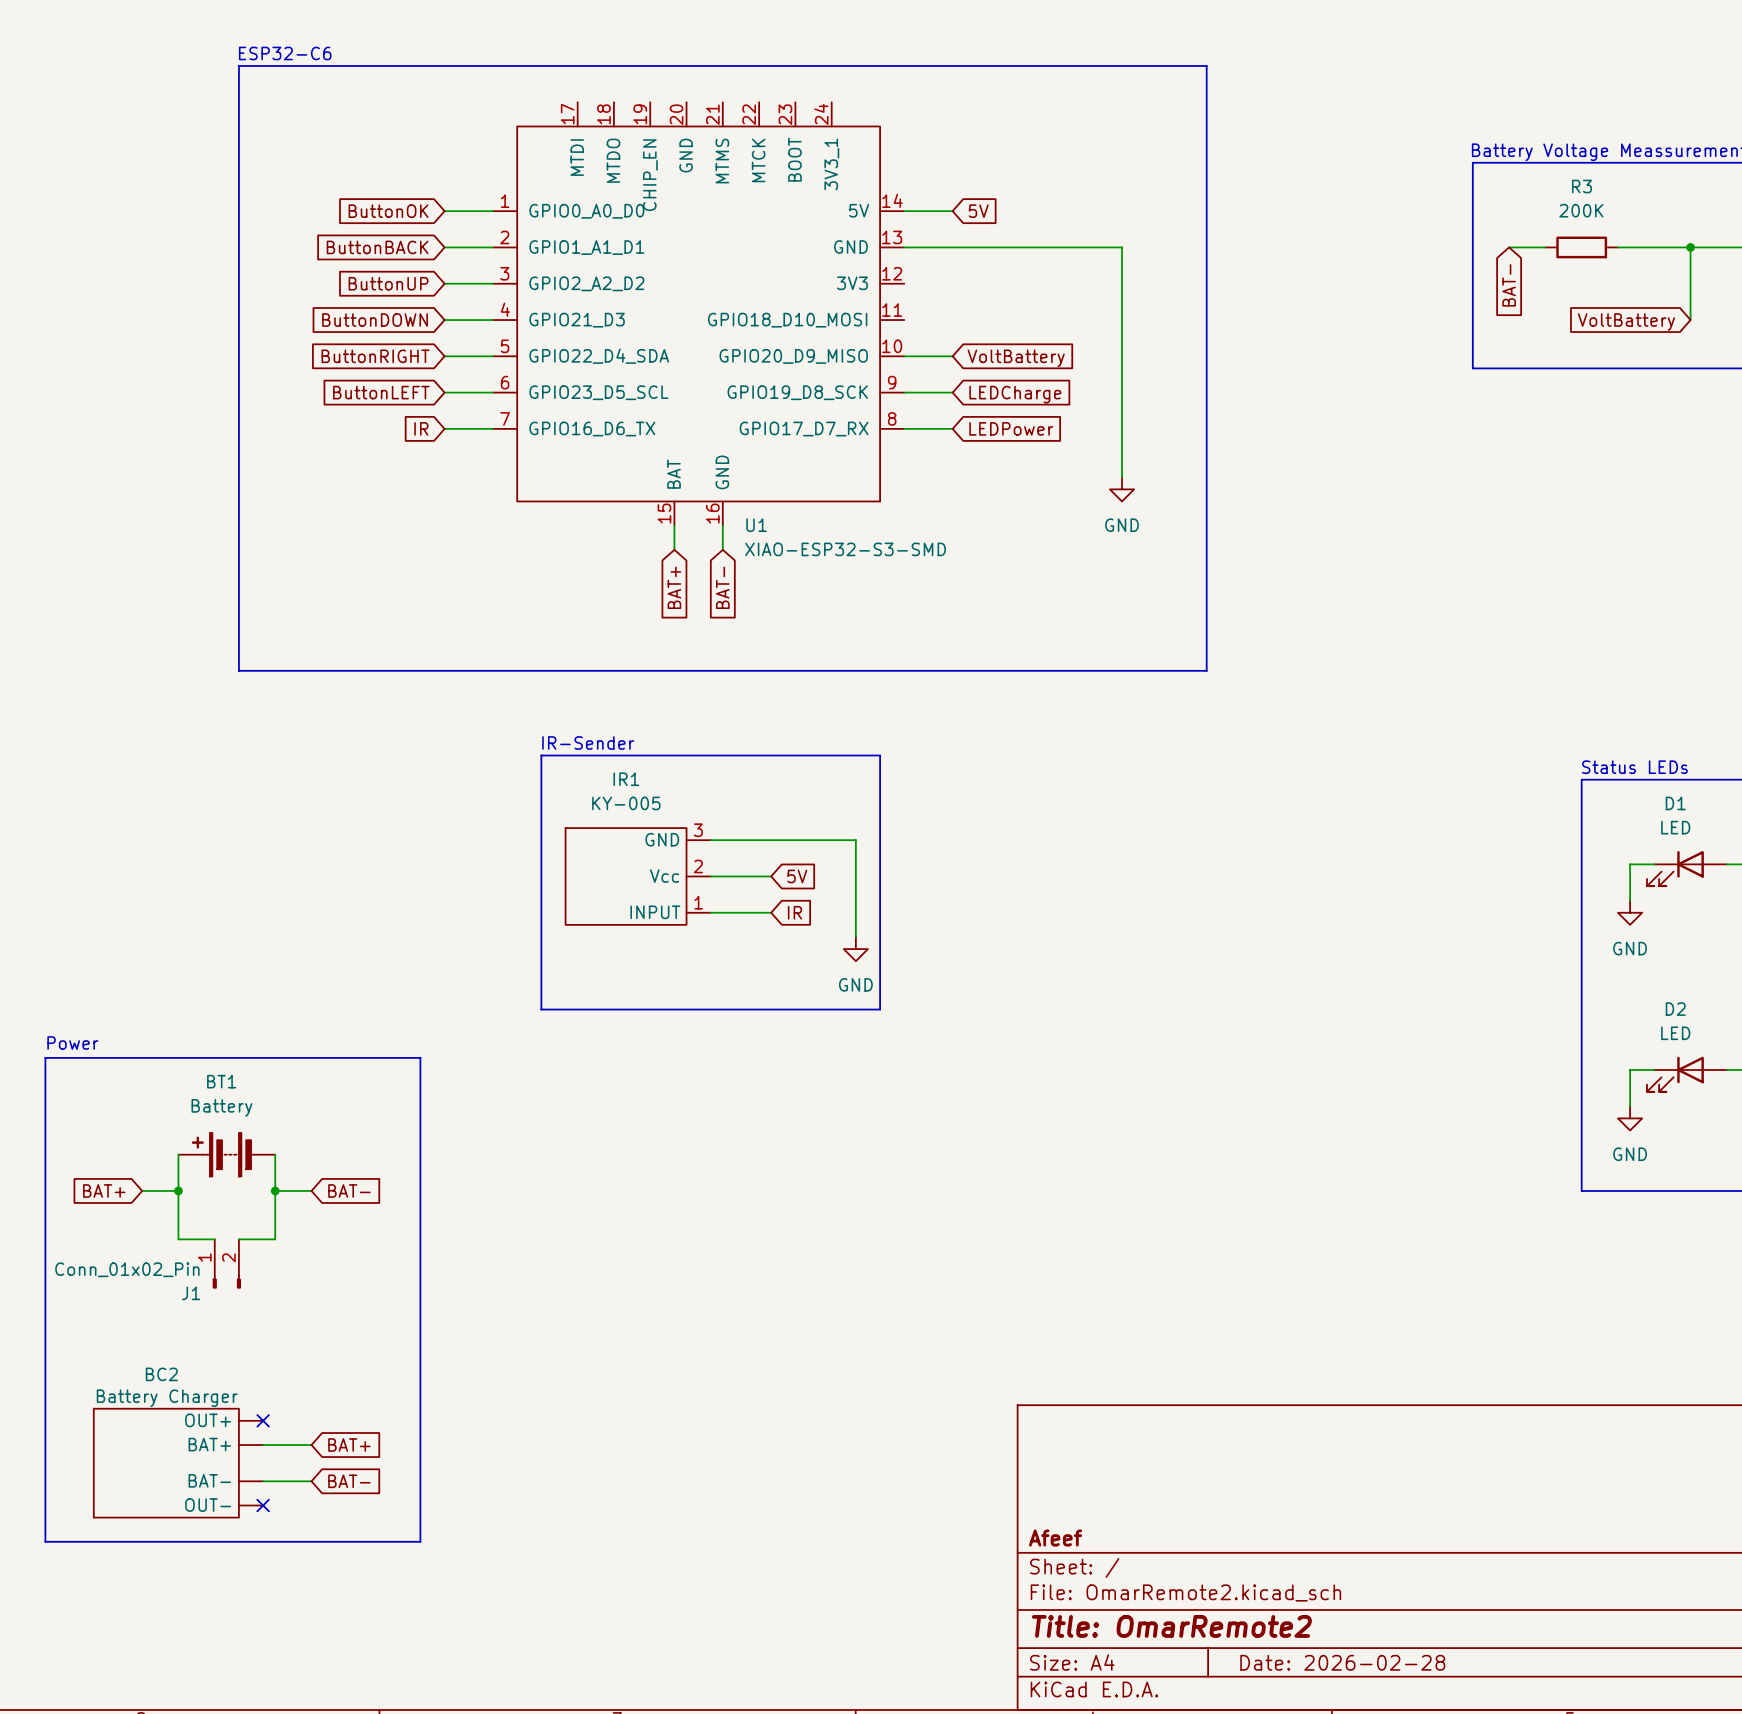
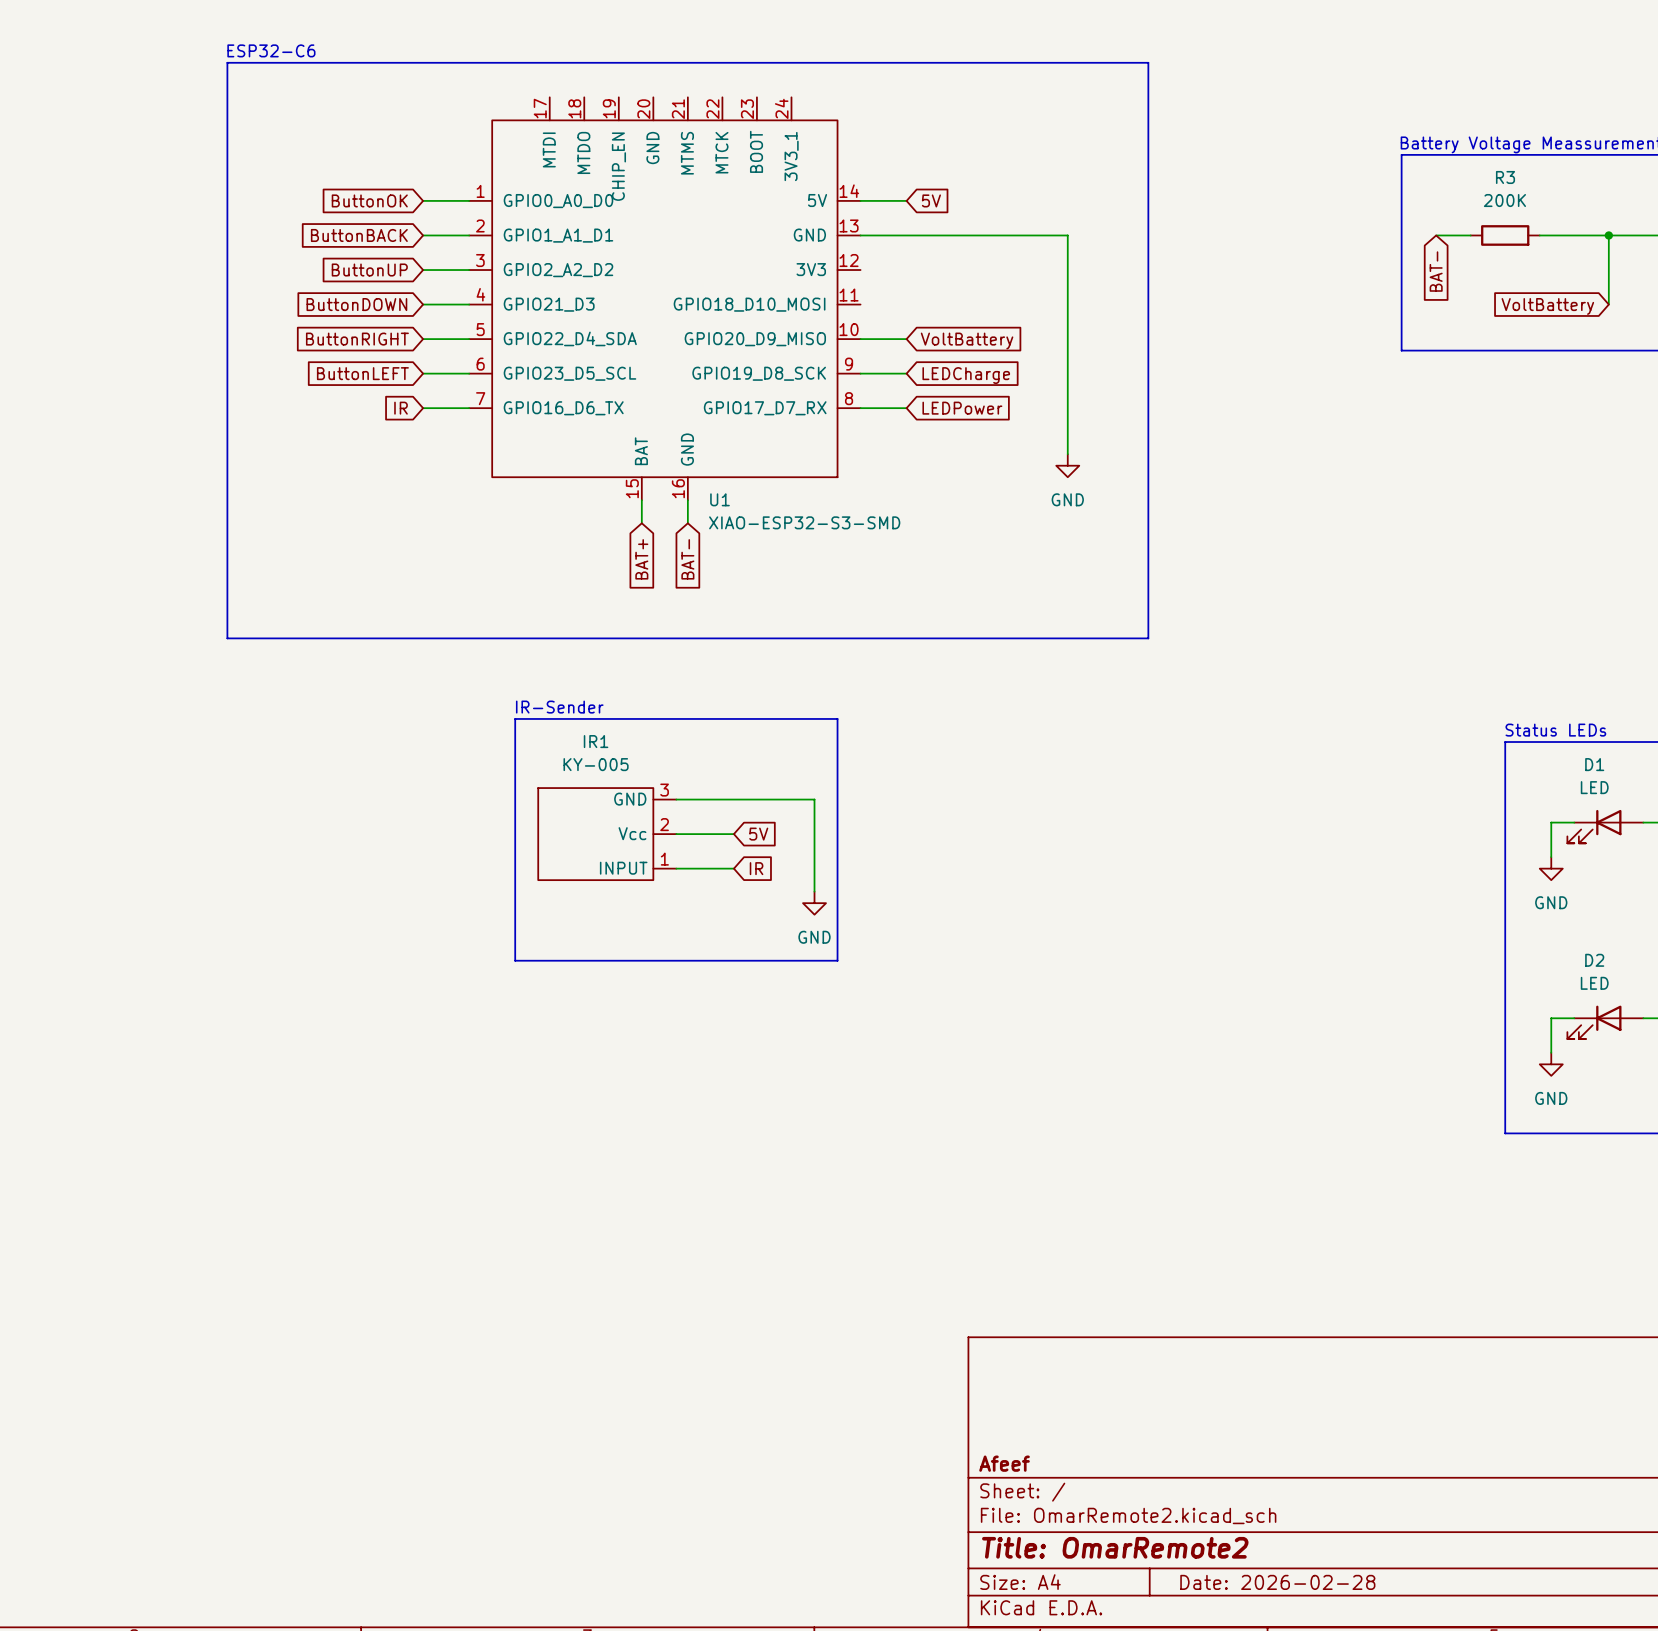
text: Power (72, 1042) -> none
line: (45, 1057) (420, 1057) (420, 1541) (45, 1541) (45, 1057) -> none
wire: (178, 1154) (178, 1239) (214, 1239) -> none
BT1: Battery (226, 1154) -> none
wire: (275, 1154) (275, 1239) (238, 1239) -> none
global label: BAT+ (104, 1190) -> none
wire: (142, 1190) (178, 1190) -> none
junction: (178, 1190) -> none
wire: (275, 1190) (311, 1190) -> none
junction: (275, 1190) -> none
global label: BAT- (349, 1190) -> none
J1: Conn_01x02_Pin (226, 1263) -> none
no-connect mark: (263, 1420) -> none
wire: (263, 1445) (311, 1445) -> none
global label: BAT+ (349, 1445) -> none
BC2: Battery Charger (178, 1463) -> none
wire: (263, 1481) (311, 1481) -> none
global label: BAT- (349, 1481) -> none
no-connect mark: (263, 1505) -> none

